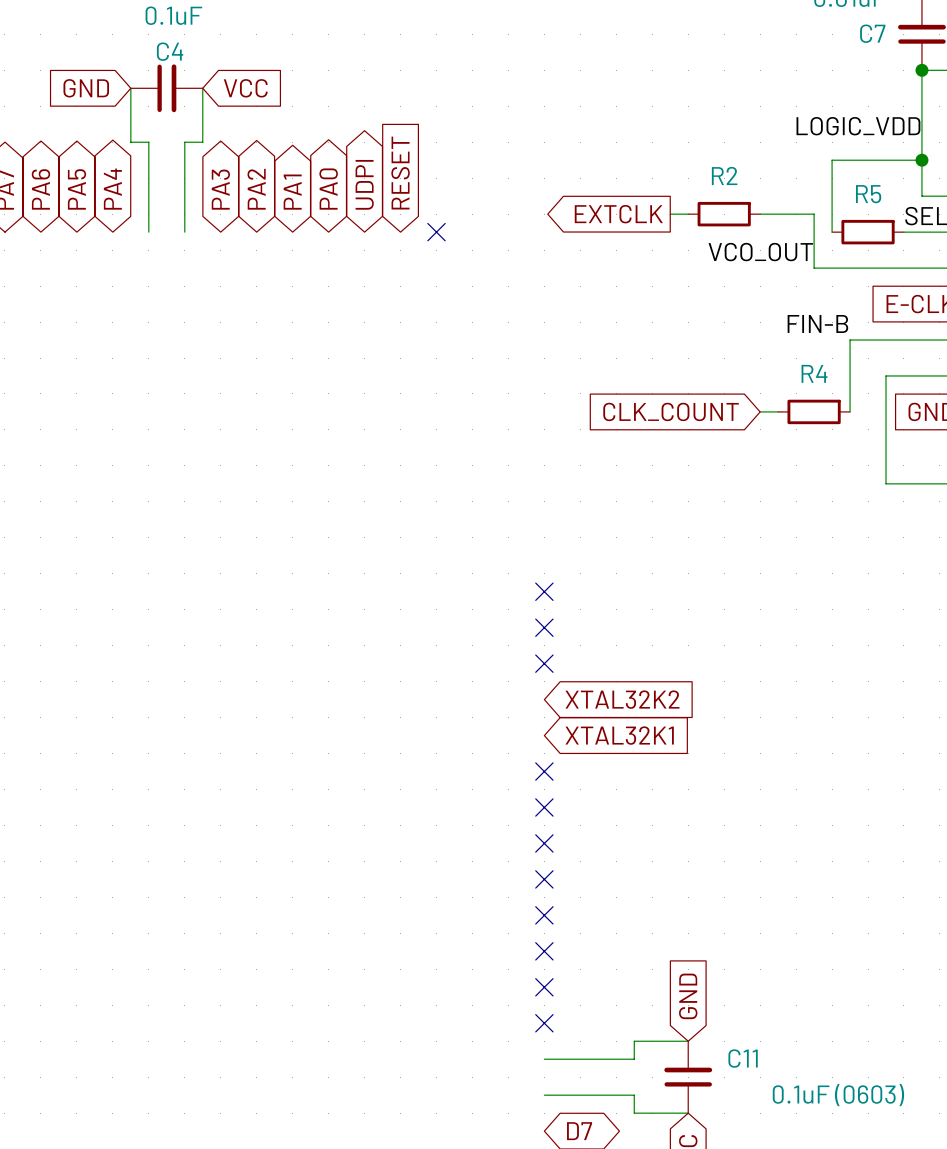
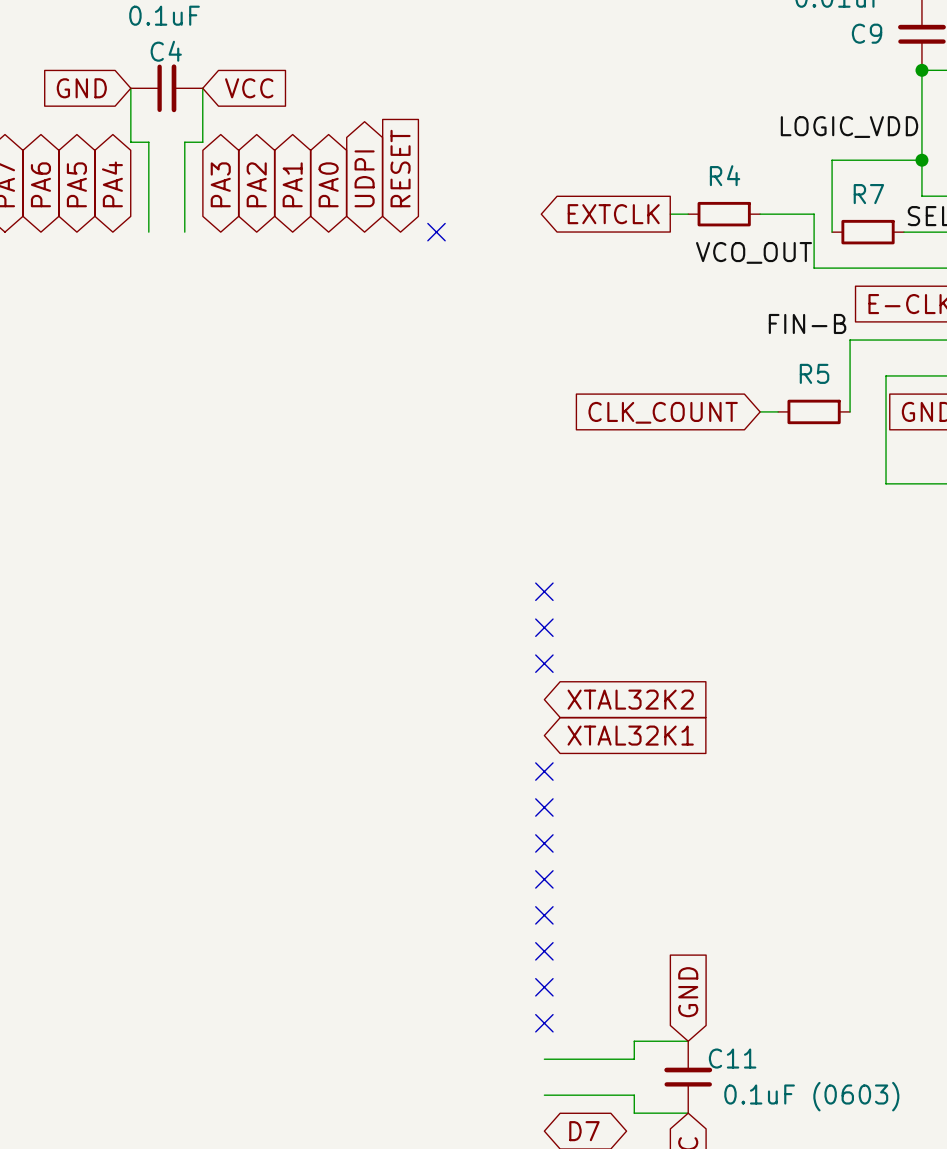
C7 name: C7 (872, 33) -> C9 (867, 33)
R2 name: R2 (724, 175) -> R4 (725, 175)
R5 name: R5 (868, 194) -> R7 (868, 194)
R4 name: R4 (814, 373) -> R5 (814, 373)

